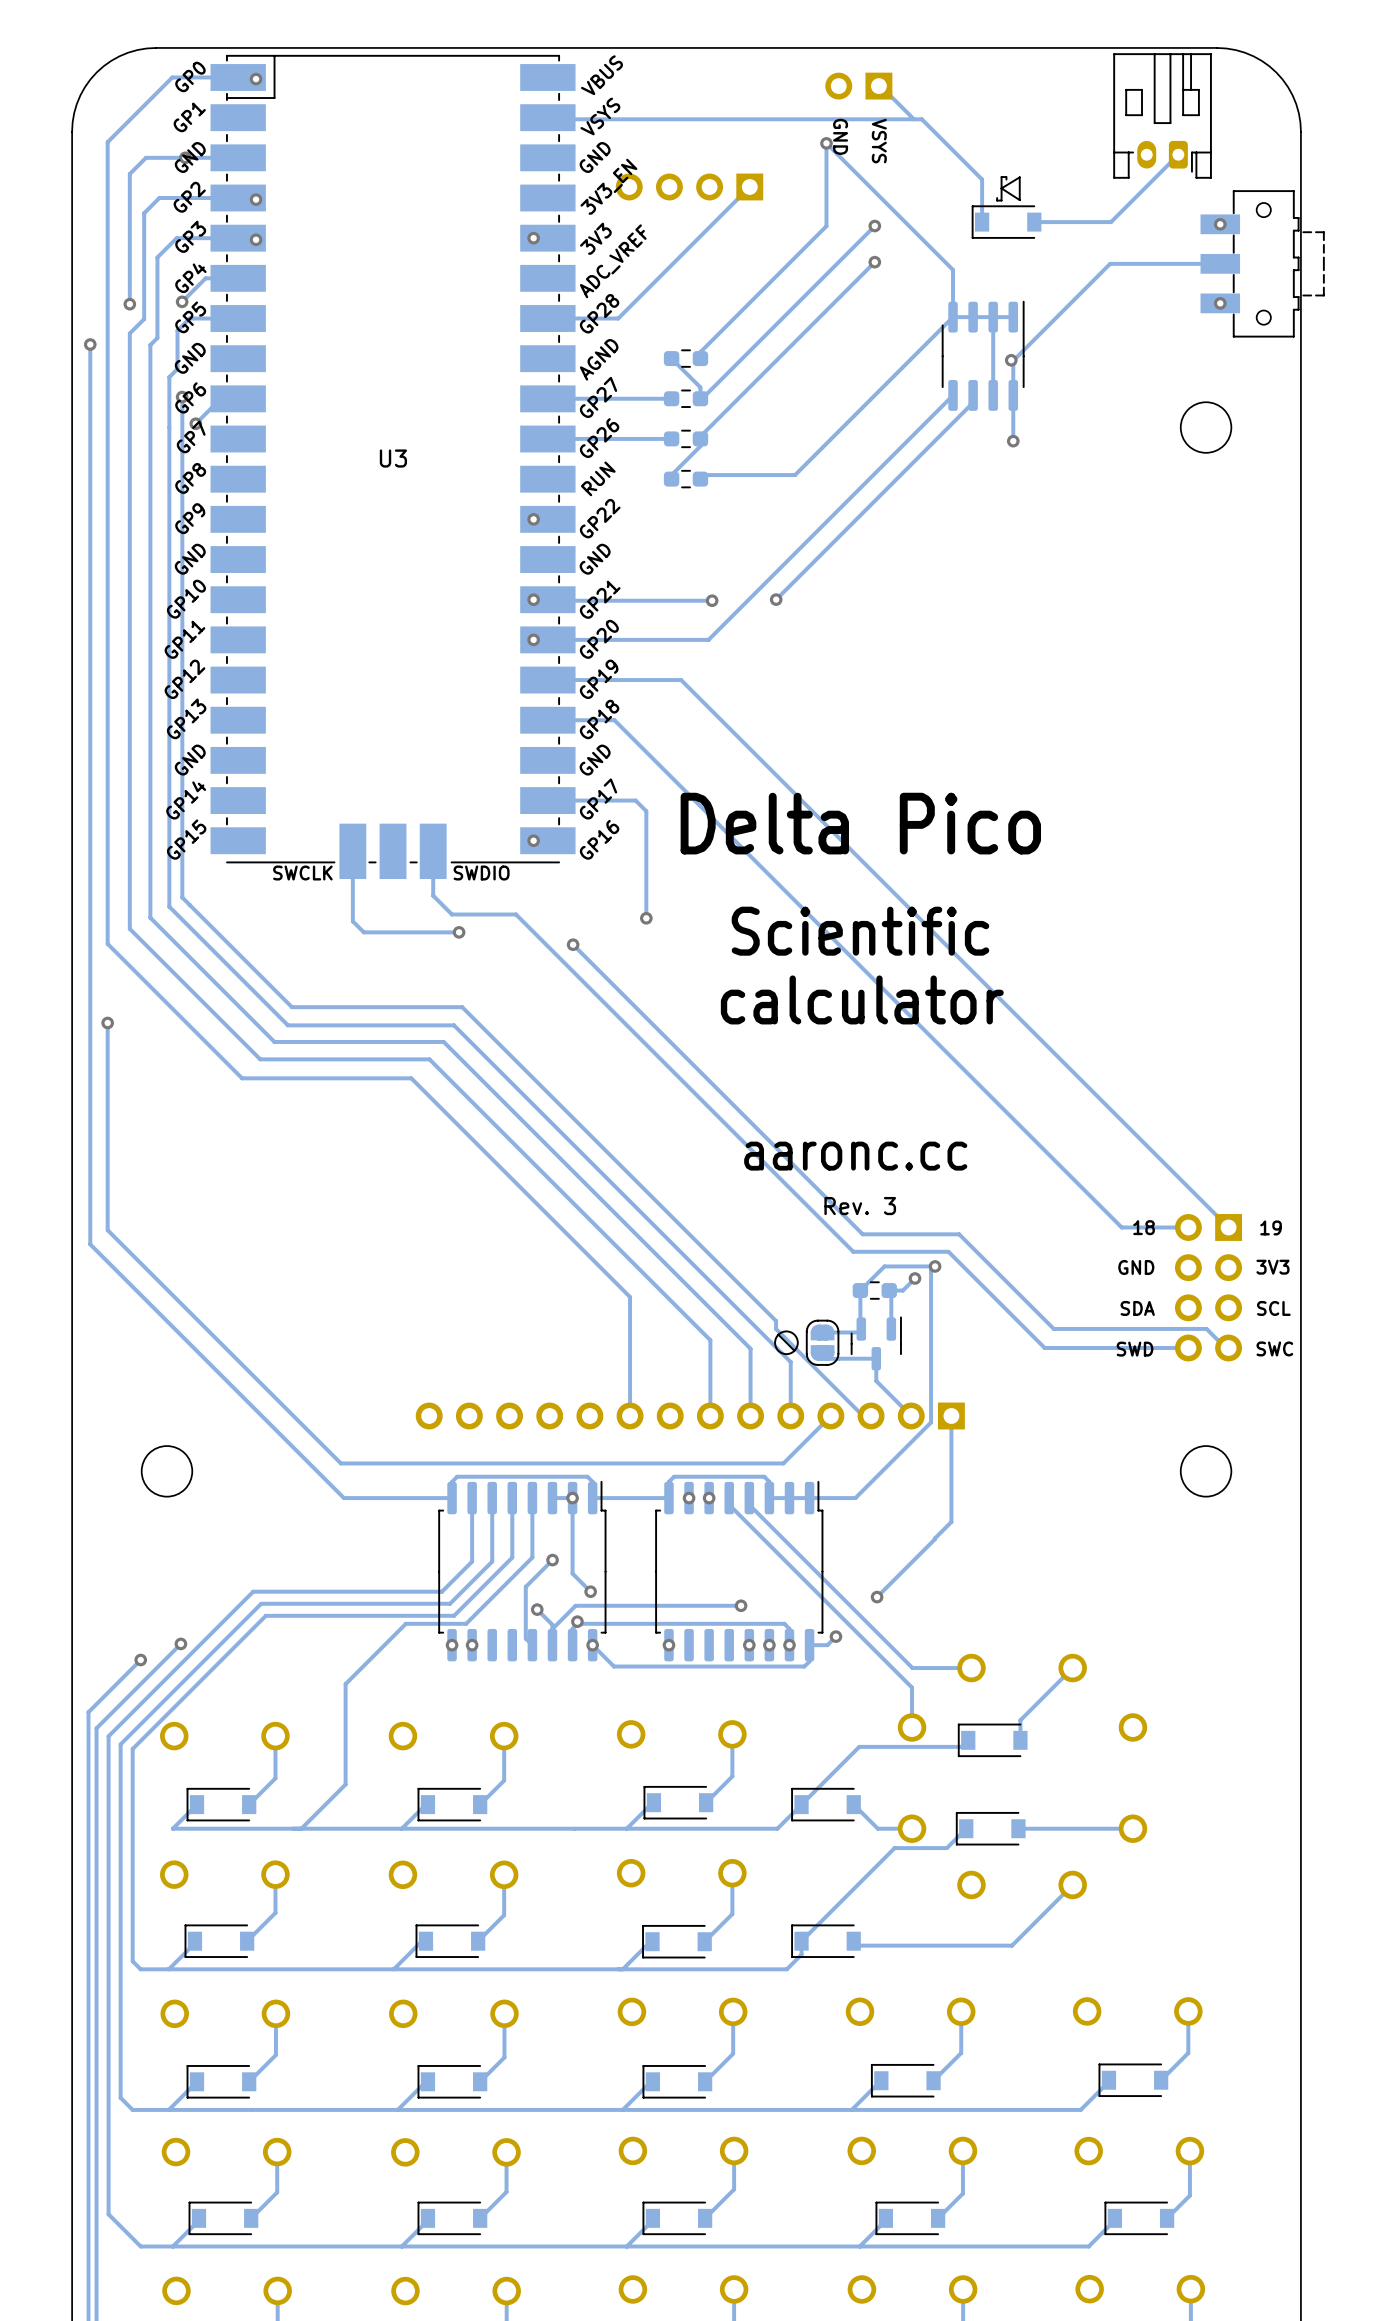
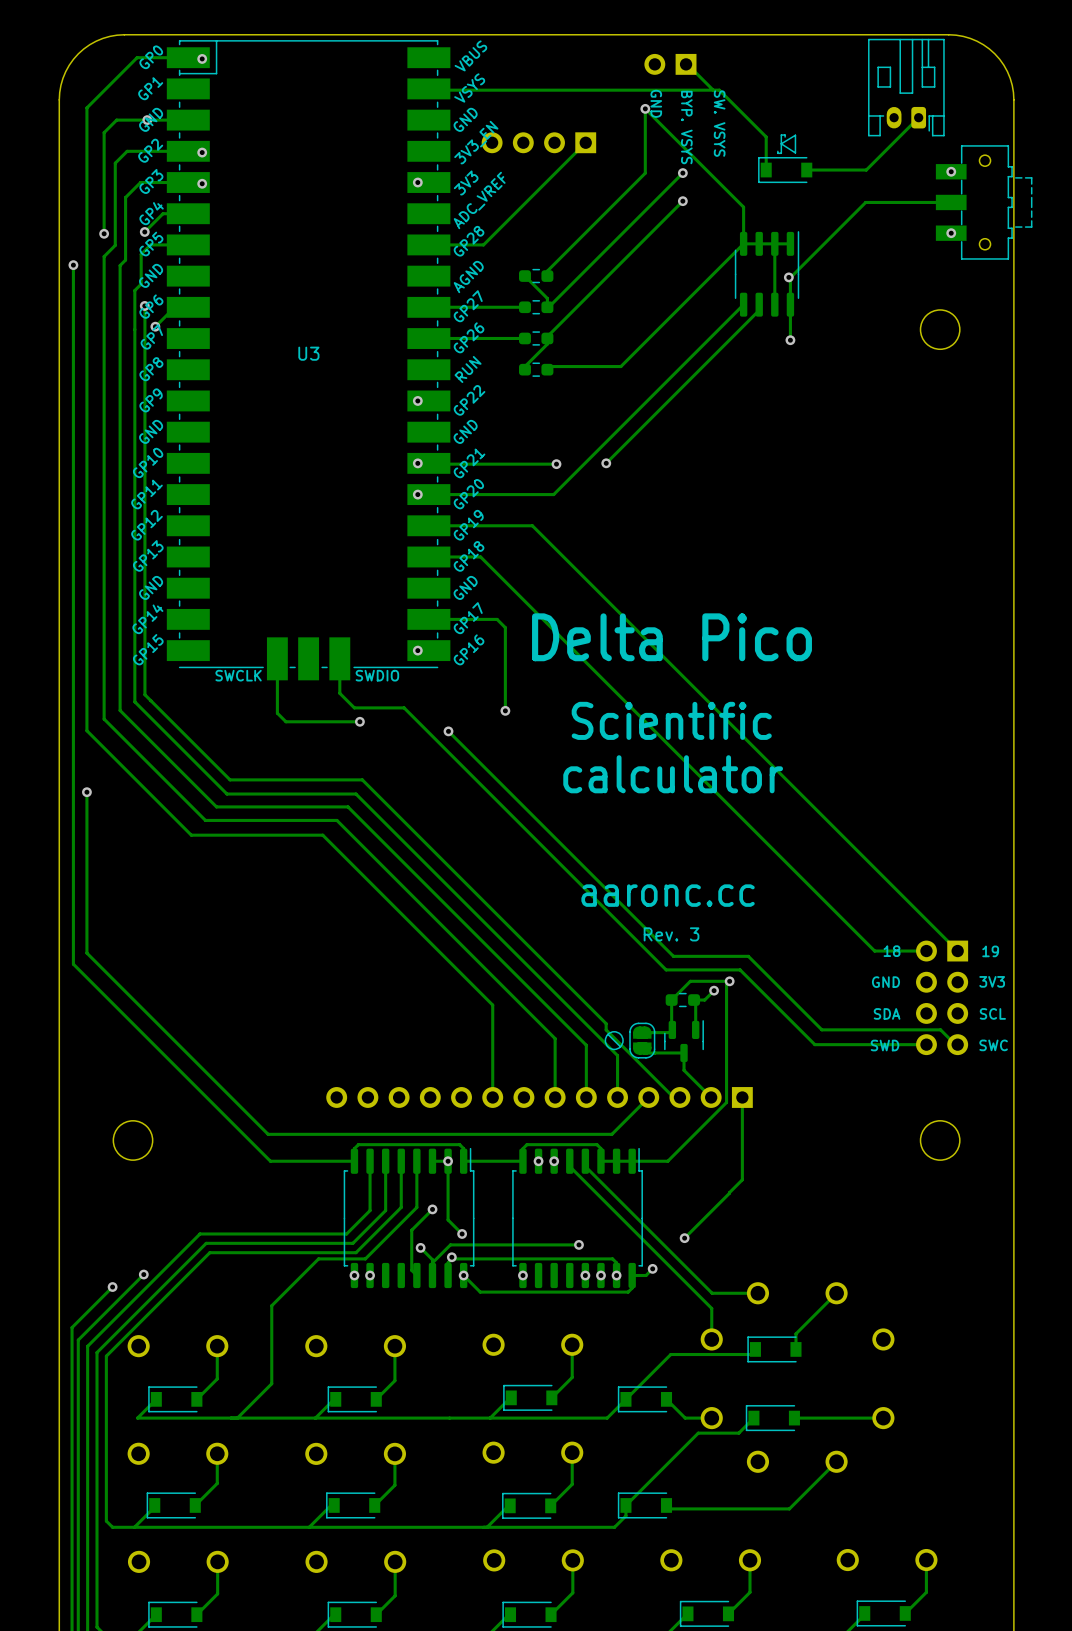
text: VSYS (879, 141) -> BYP. VSYS (686, 127)
text: none -> SW. VSYS (719, 123)

